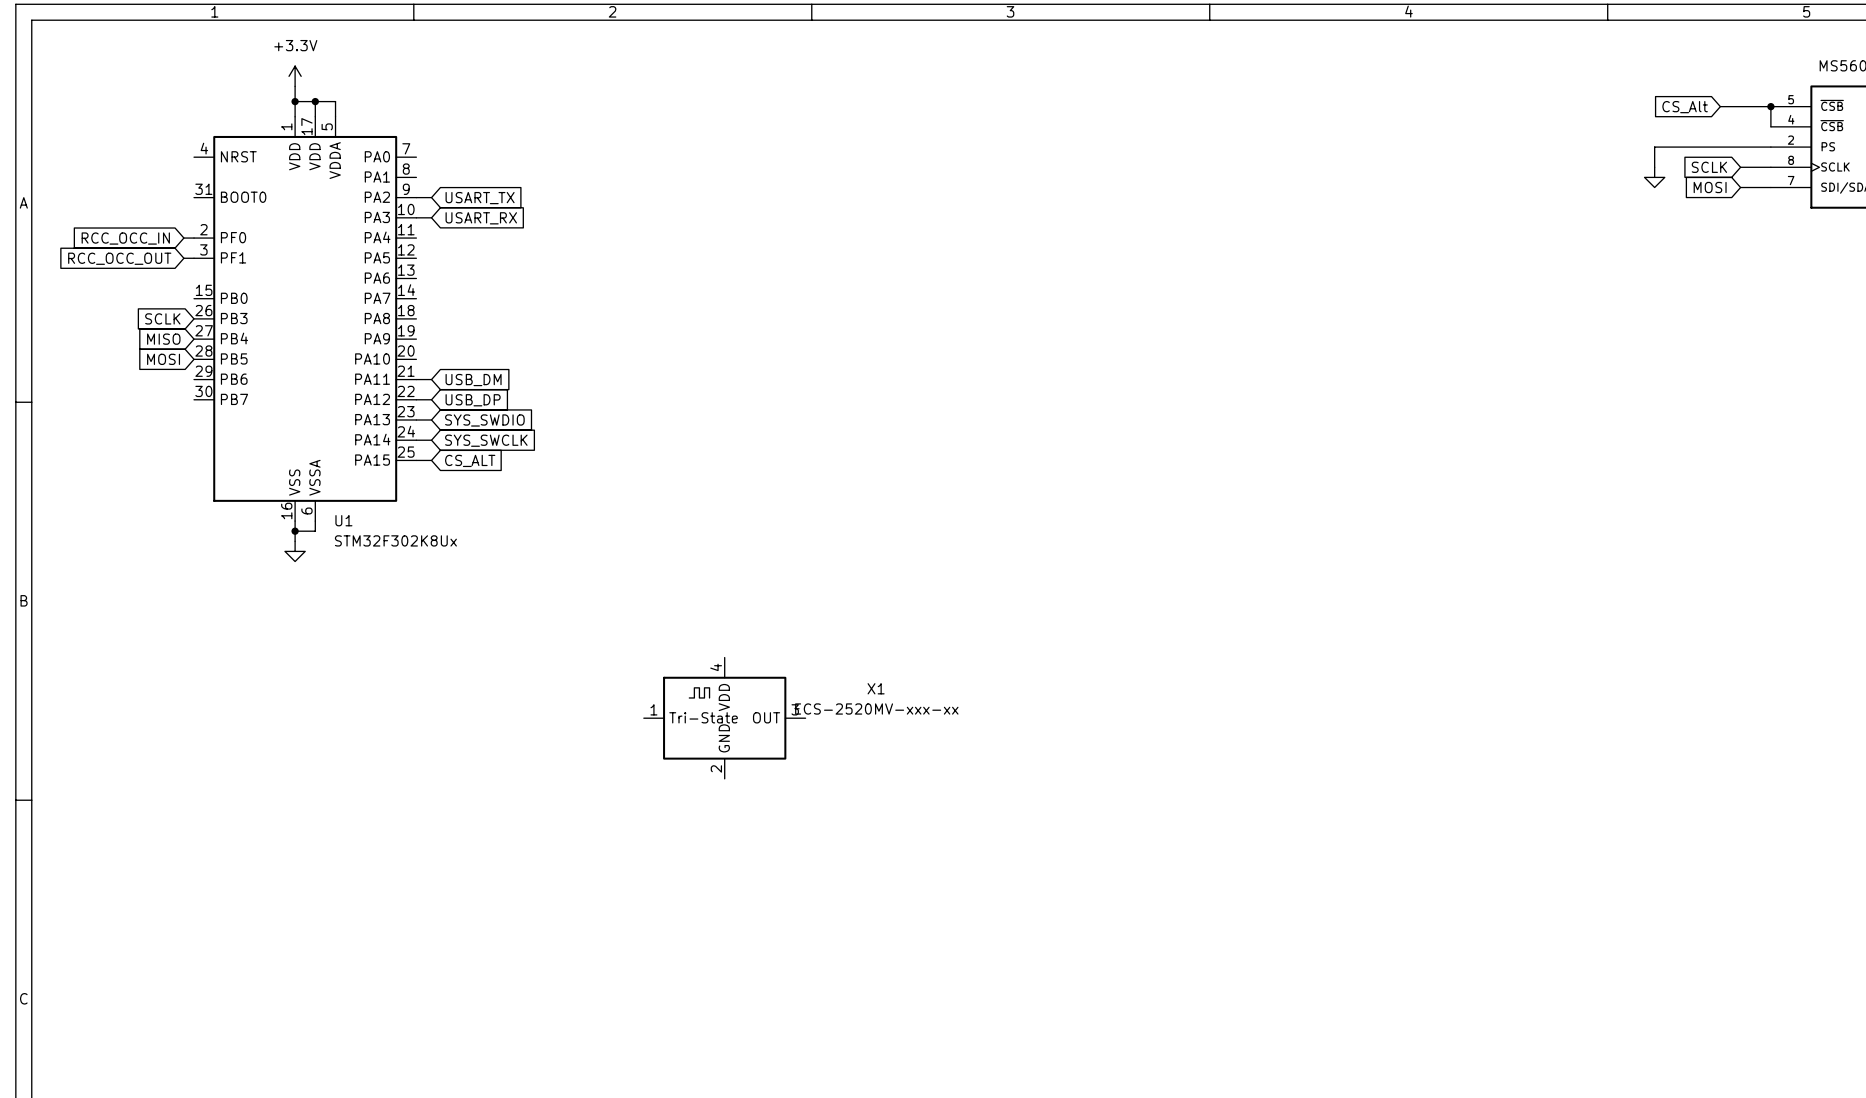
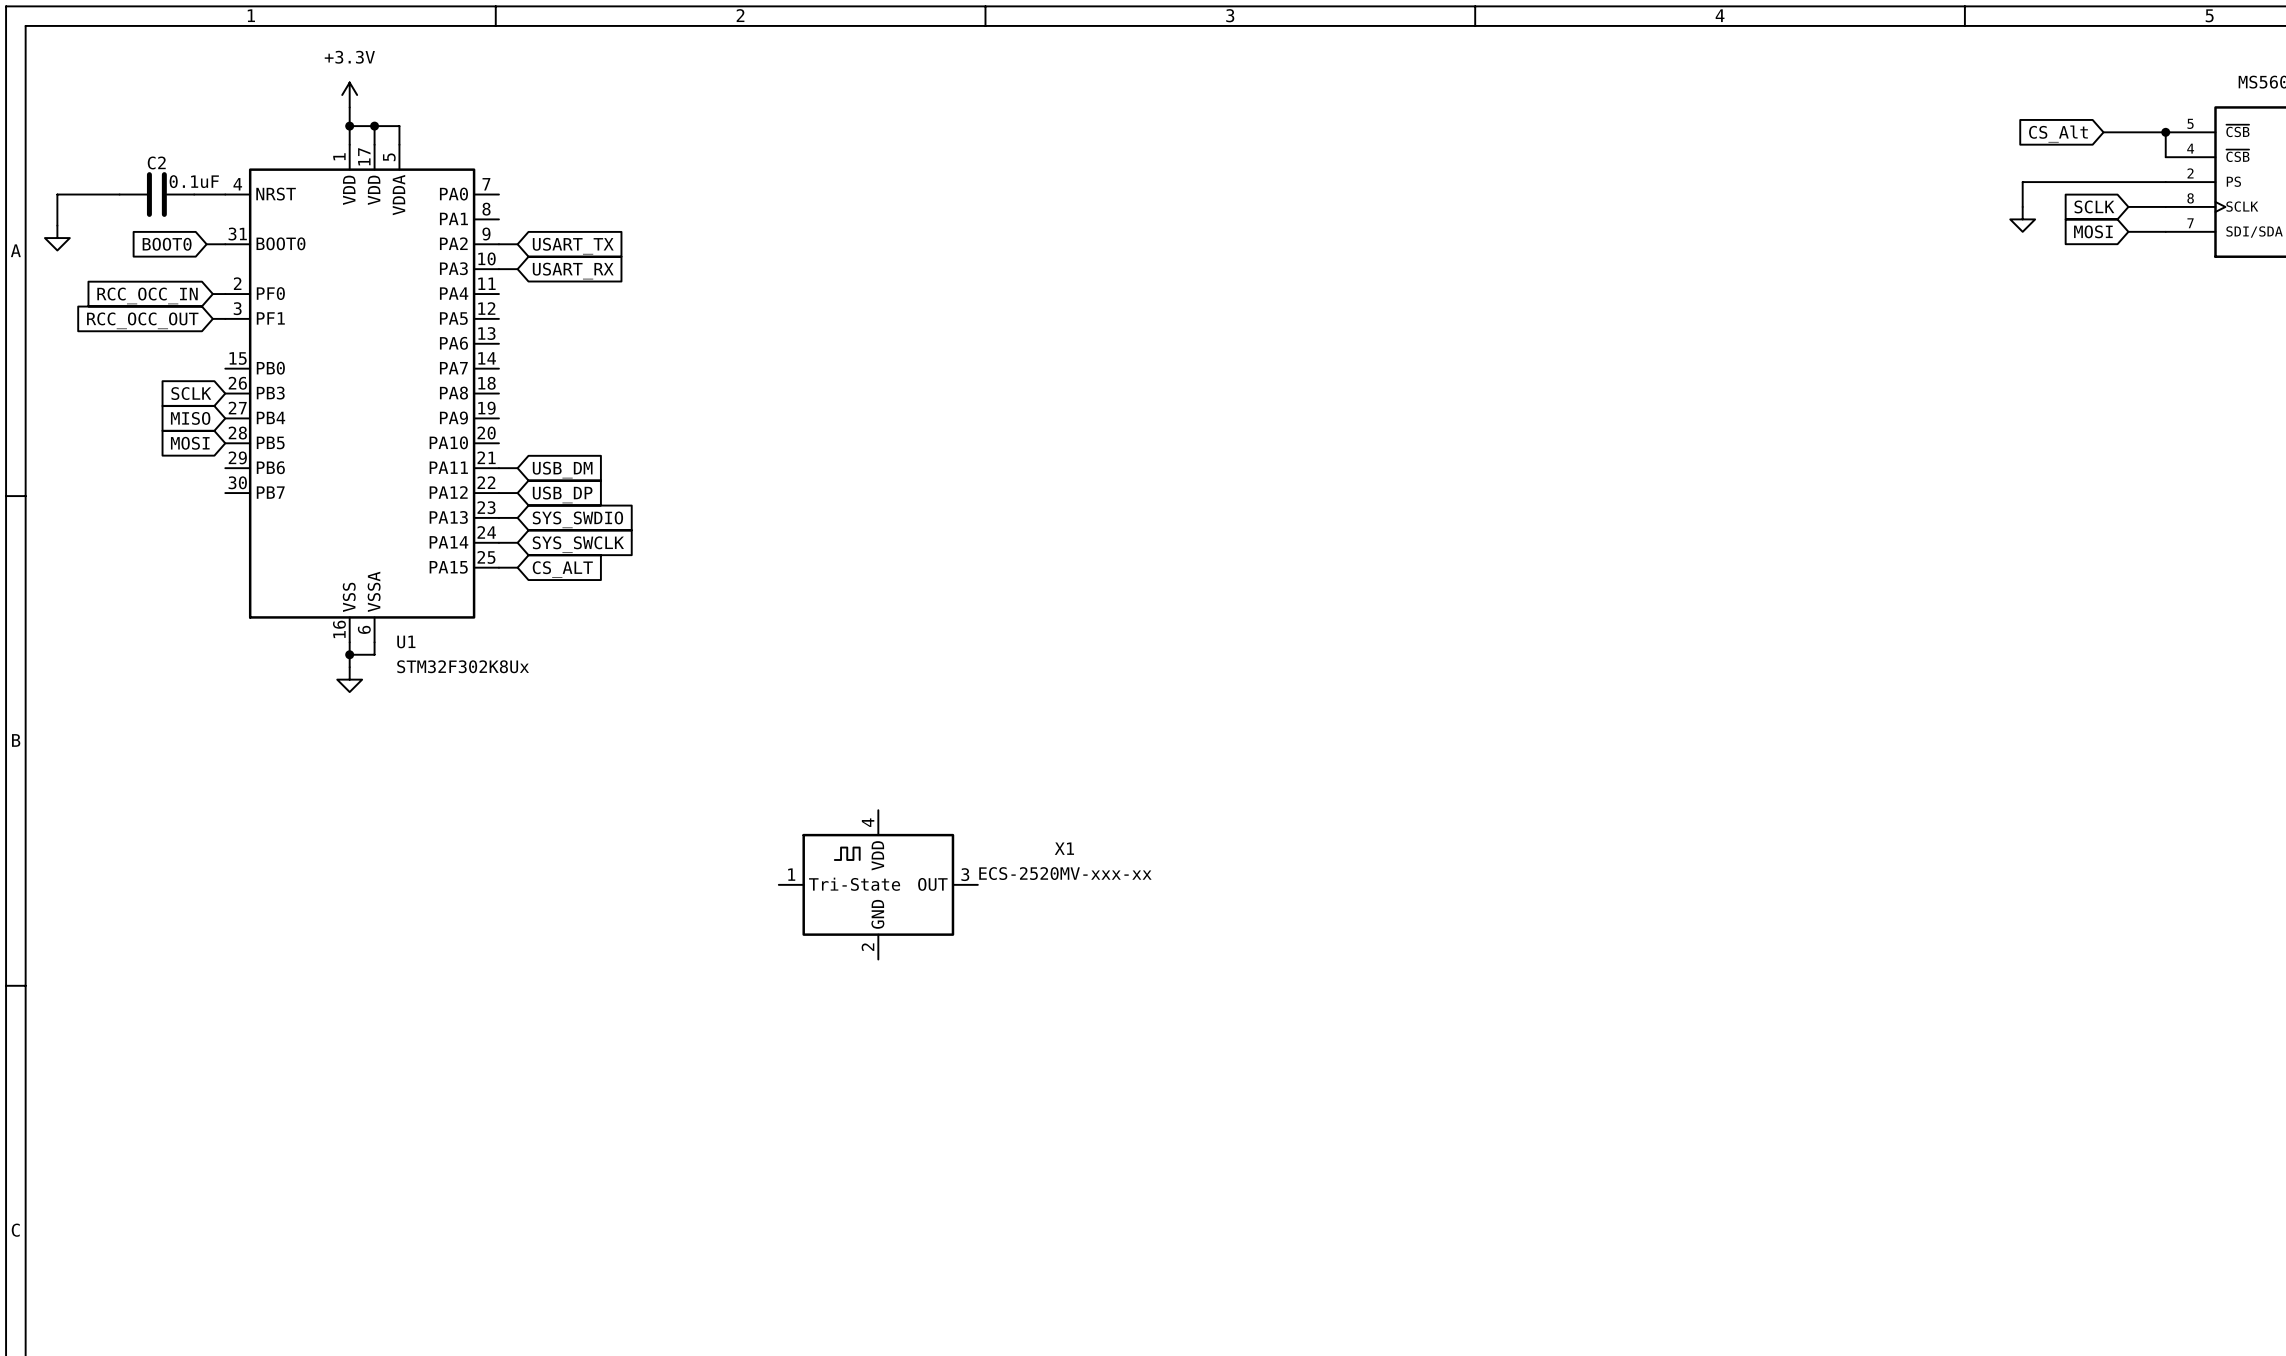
wire: none -> (119, 194) (57, 194) (57, 225)
C2: none -> 0.1uF (156, 194)
wire: none -> (194, 194) (225, 194)
power symbol: none -> (57, 238)
global label: none -> BOOT0 (167, 244)
wire: none -> (206, 244) (225, 244)

